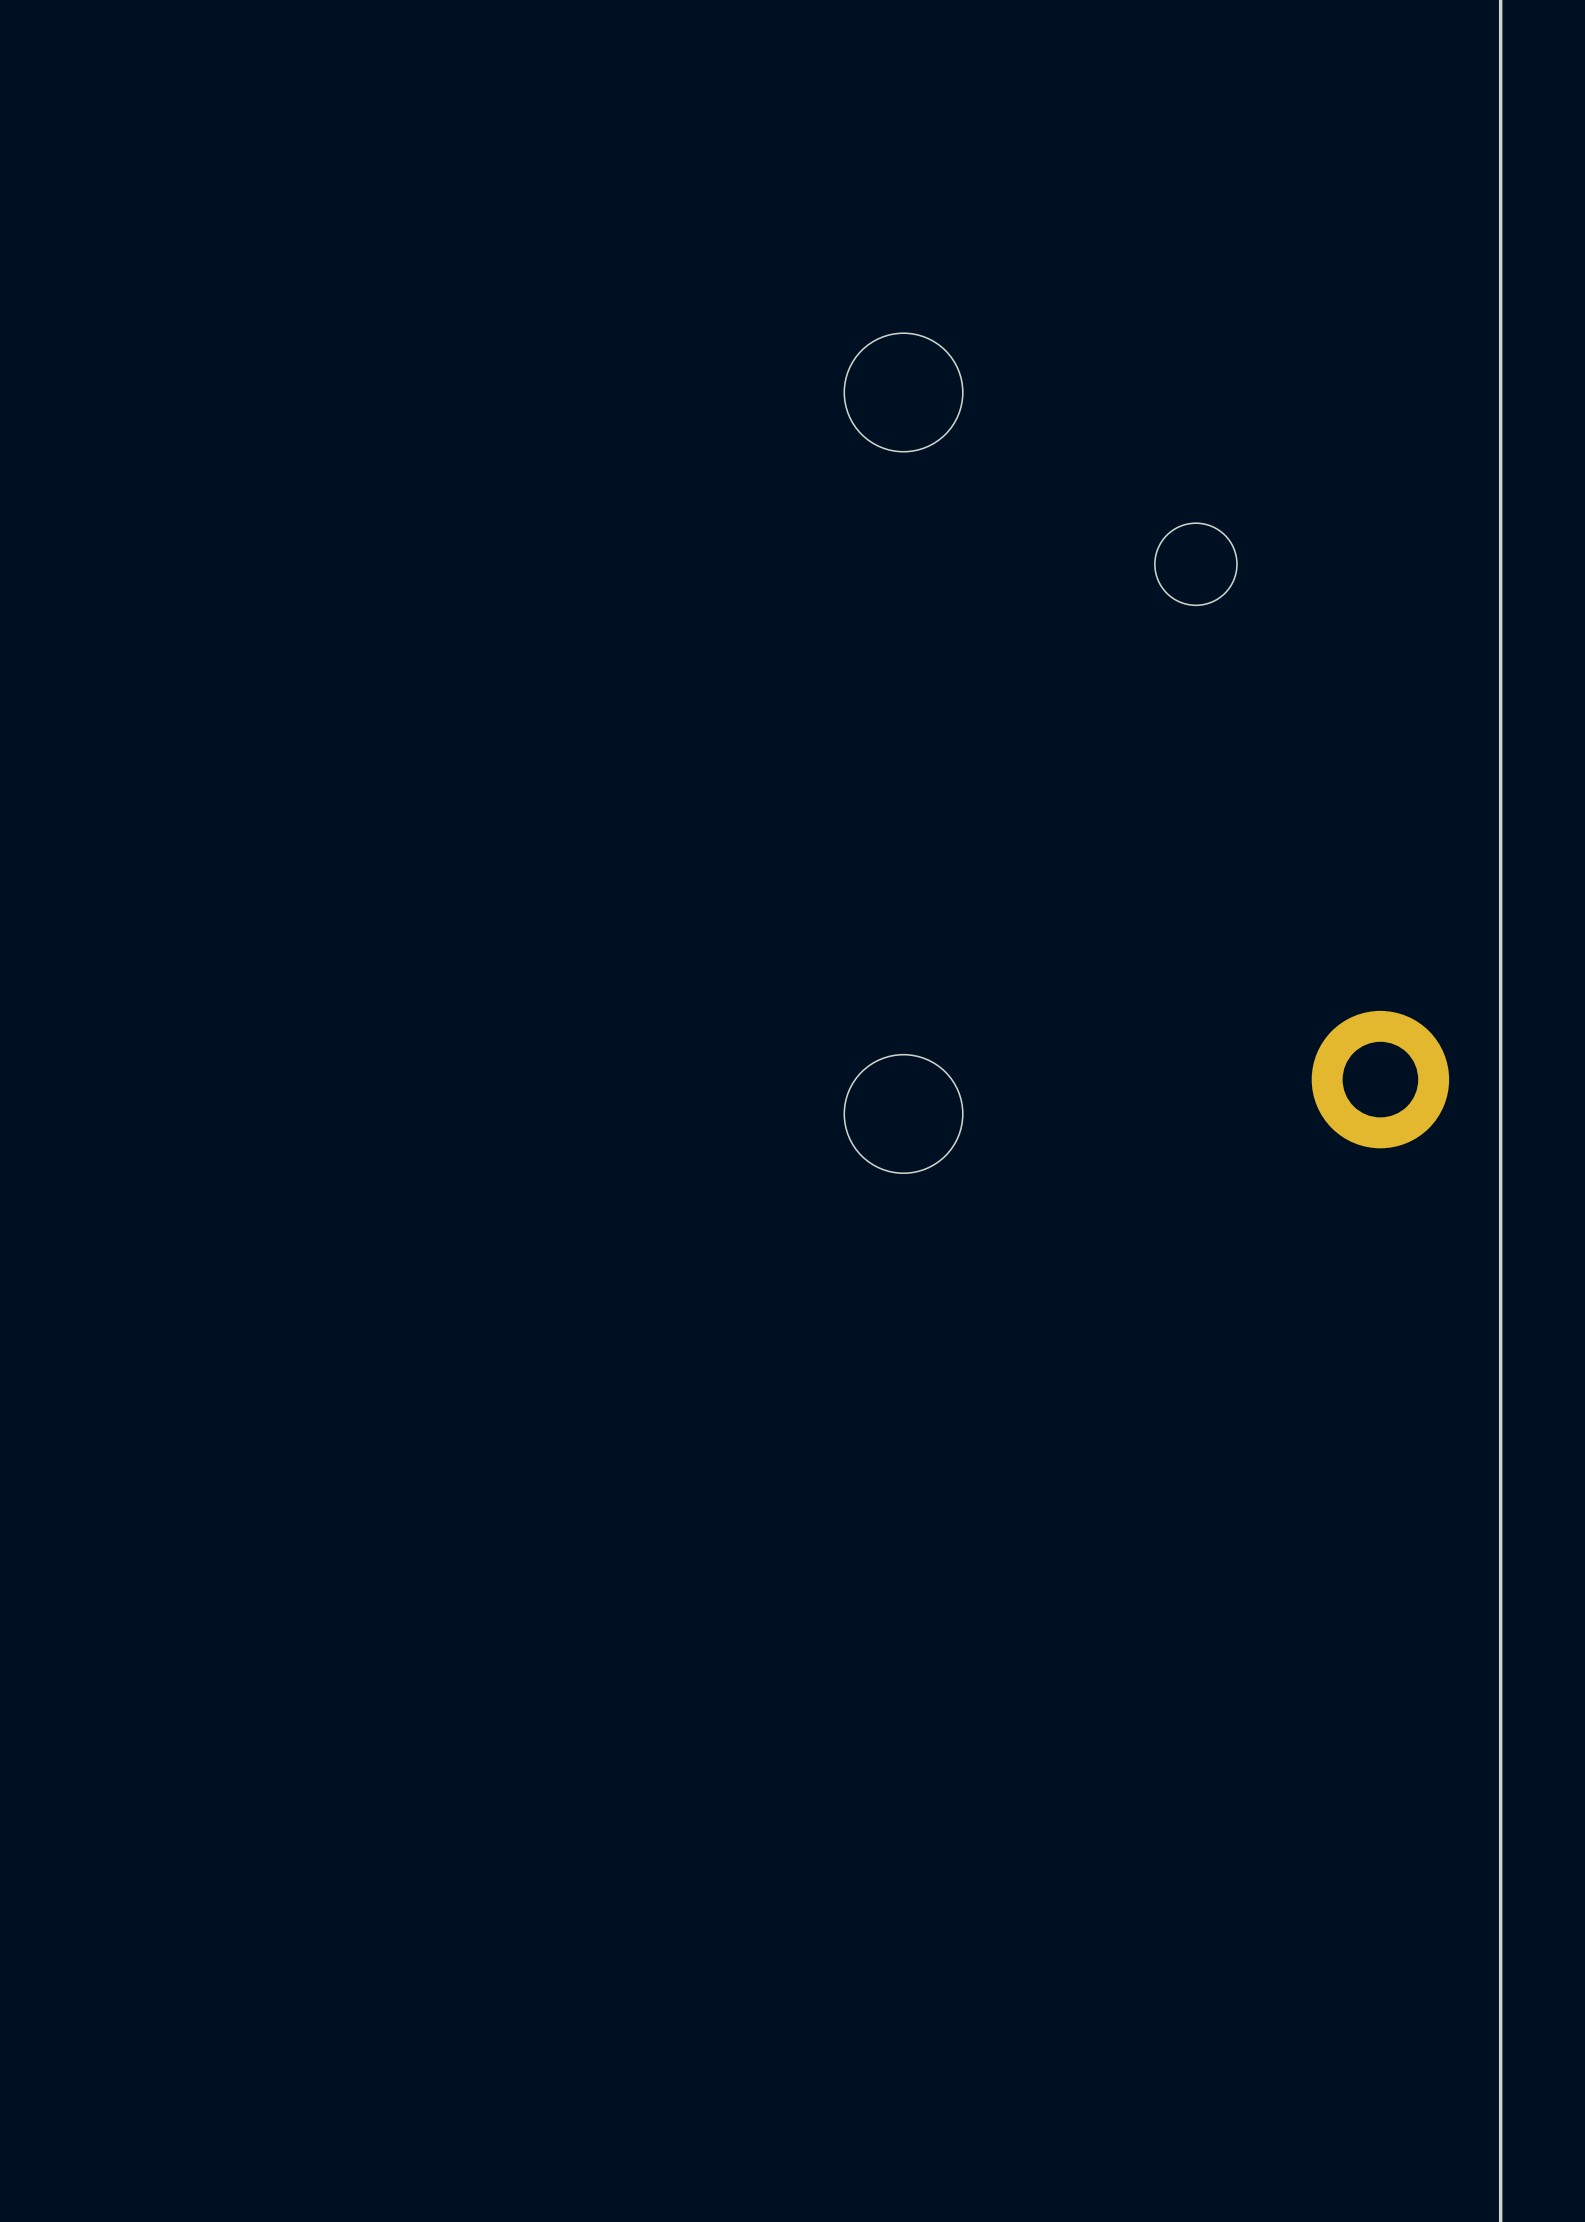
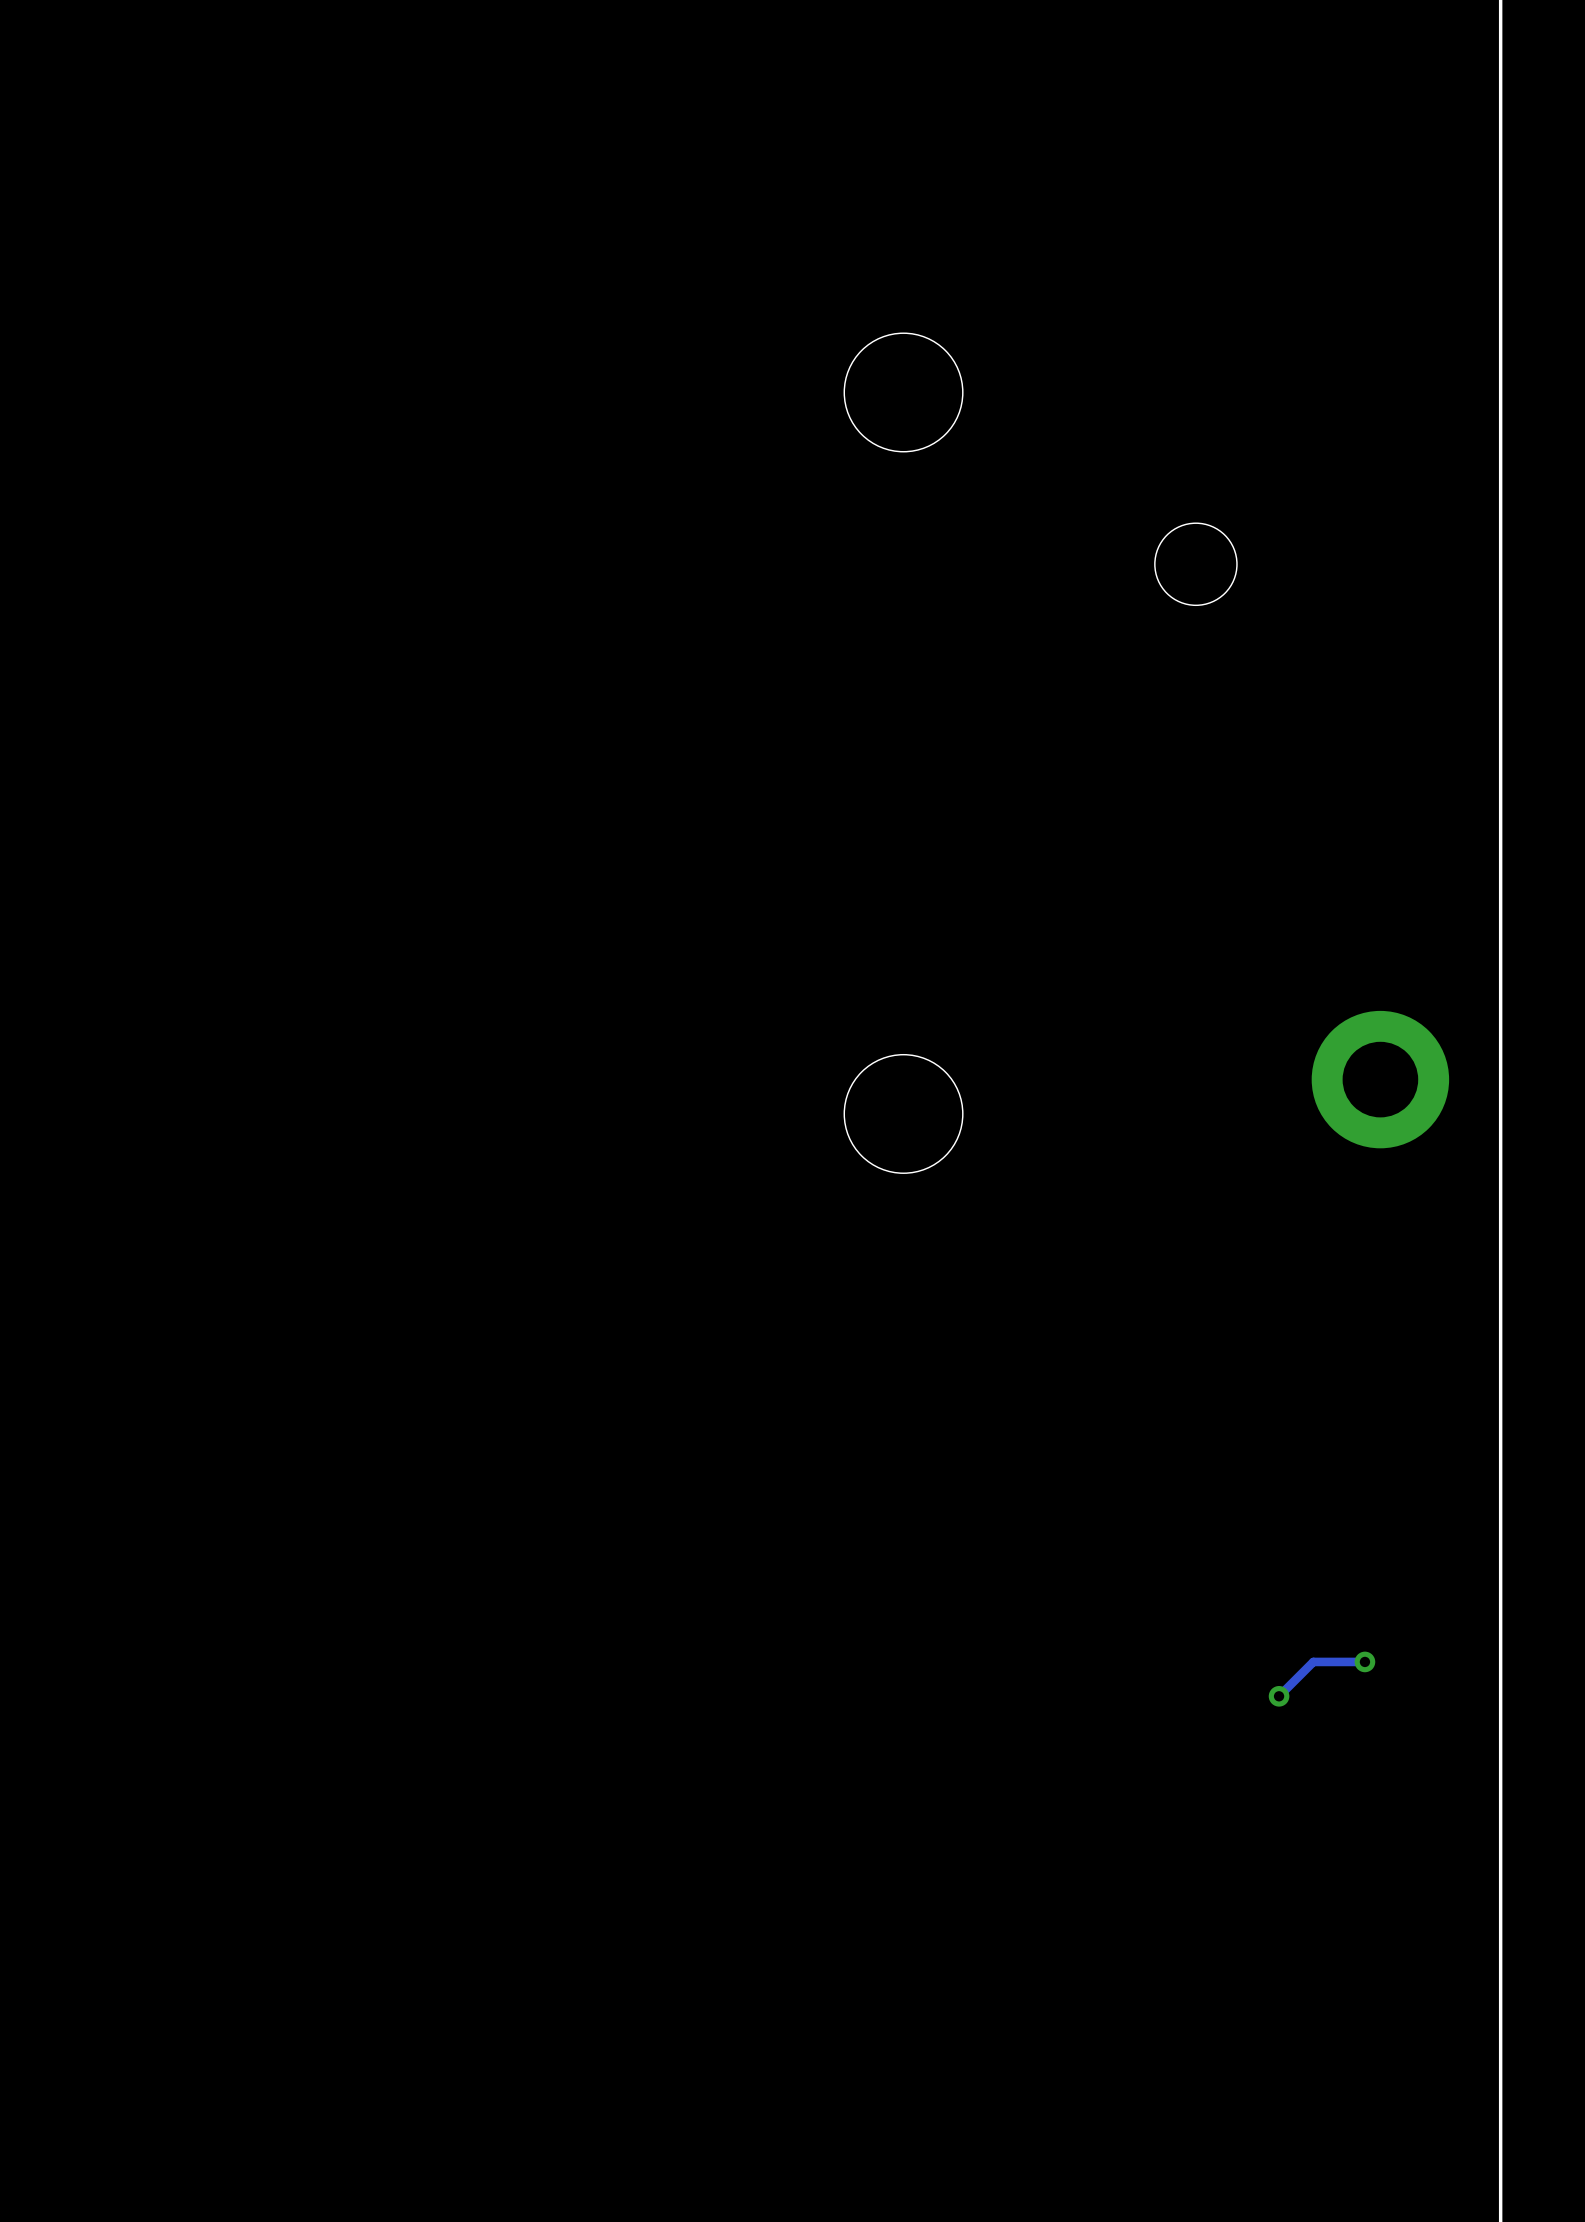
track: none -> (1364, 1661) (1313, 1661) (1279, 1696)
via: none -> (1364, 1661)
via: none -> (1279, 1696)

